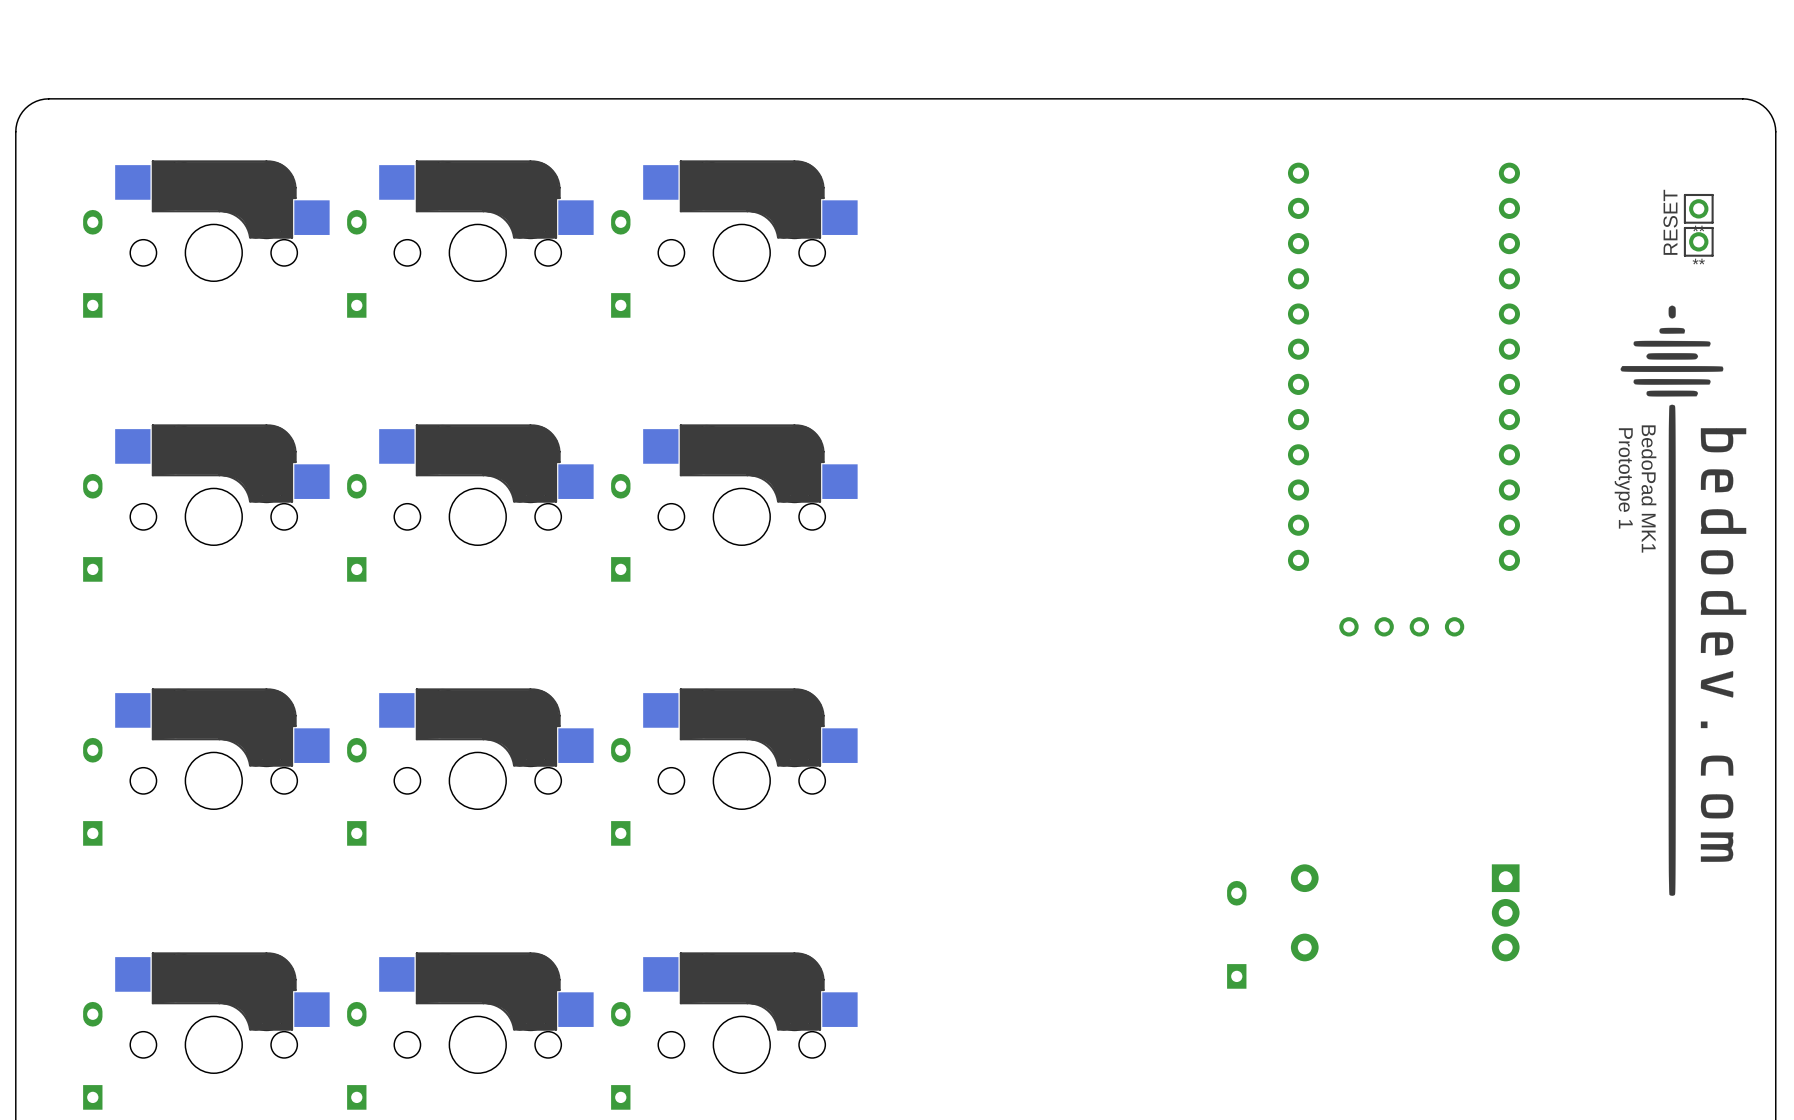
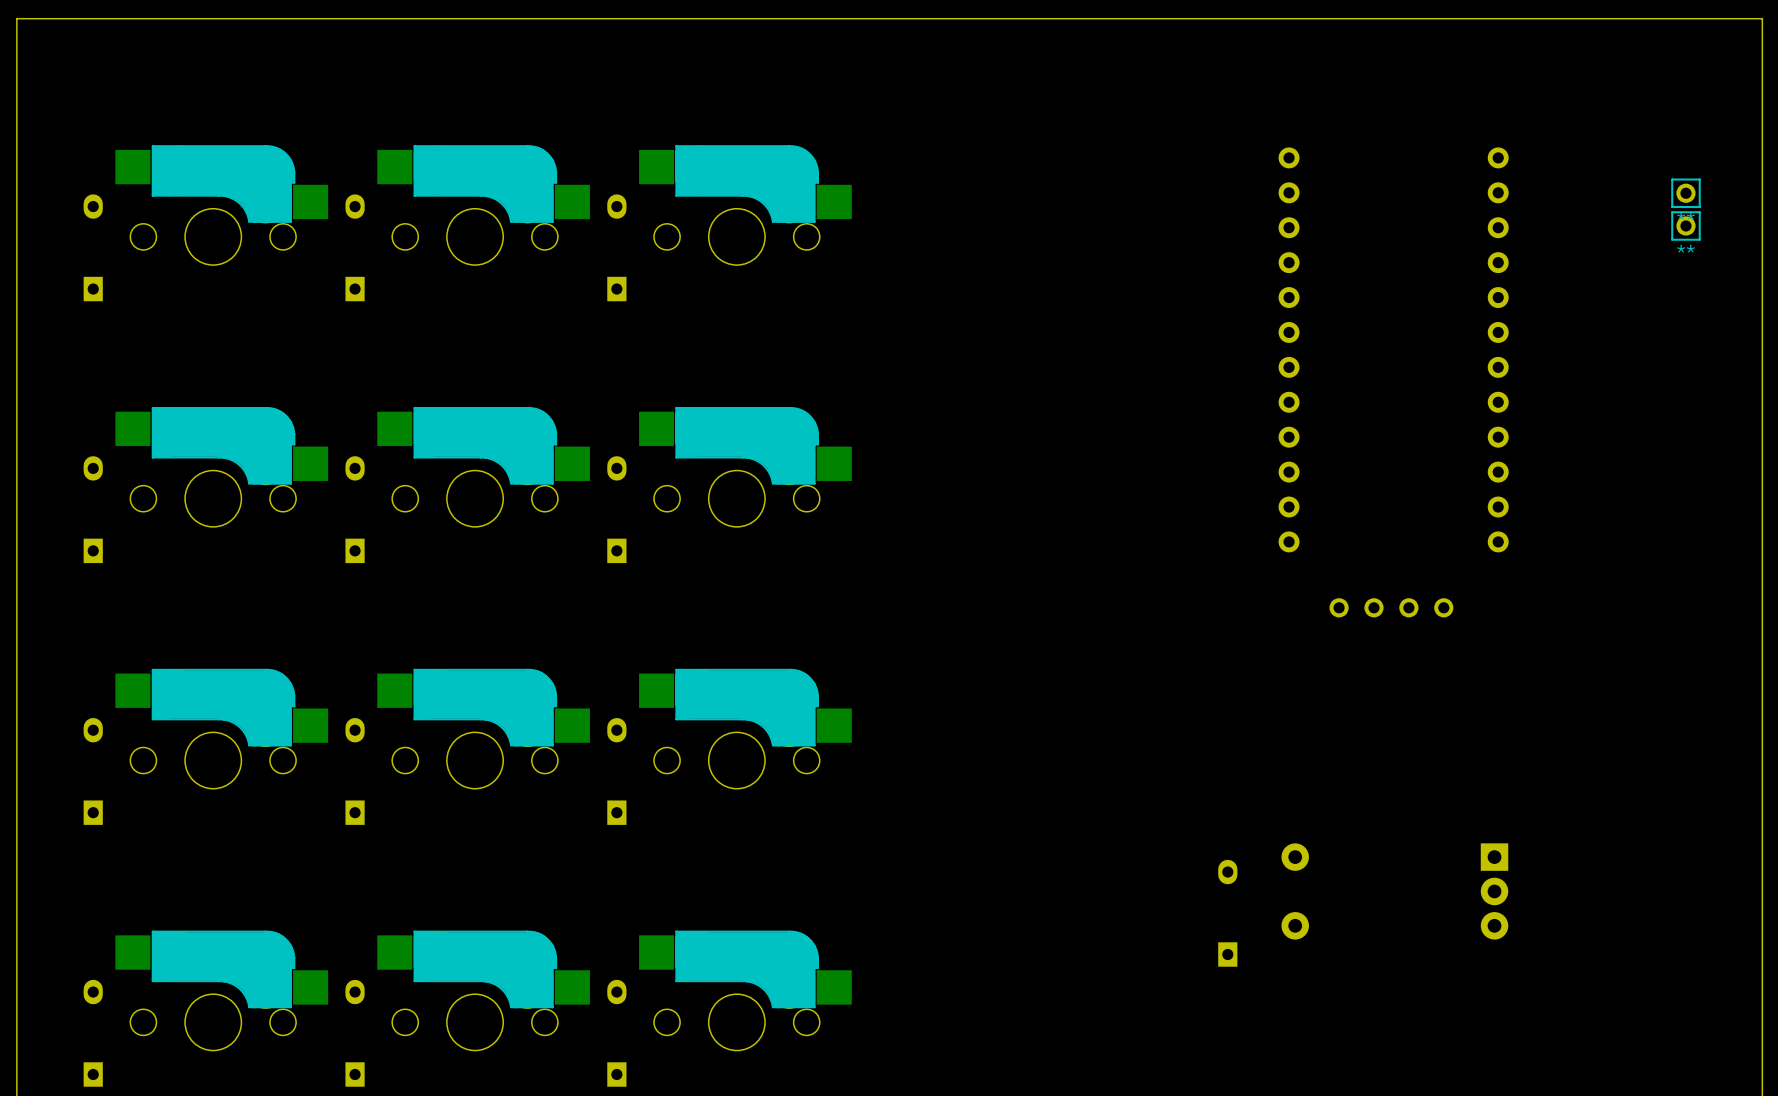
board edge: (1775, 131) (1773, 119) (1766, 108) (1755, 101) (1742, 98) (48, 98) (36, 101) (25, 108) (18, 119) (15, 131) -> (1762, 116) (1762, 18) (16, 18) (16, 116)
text: RESET (1670, 222) -> none
drawing: [1620, 305, 1747, 896] -> none
text: Prototype 1 (1623, 478) -> none
text: BedoPad MK1 (1648, 489) -> none

